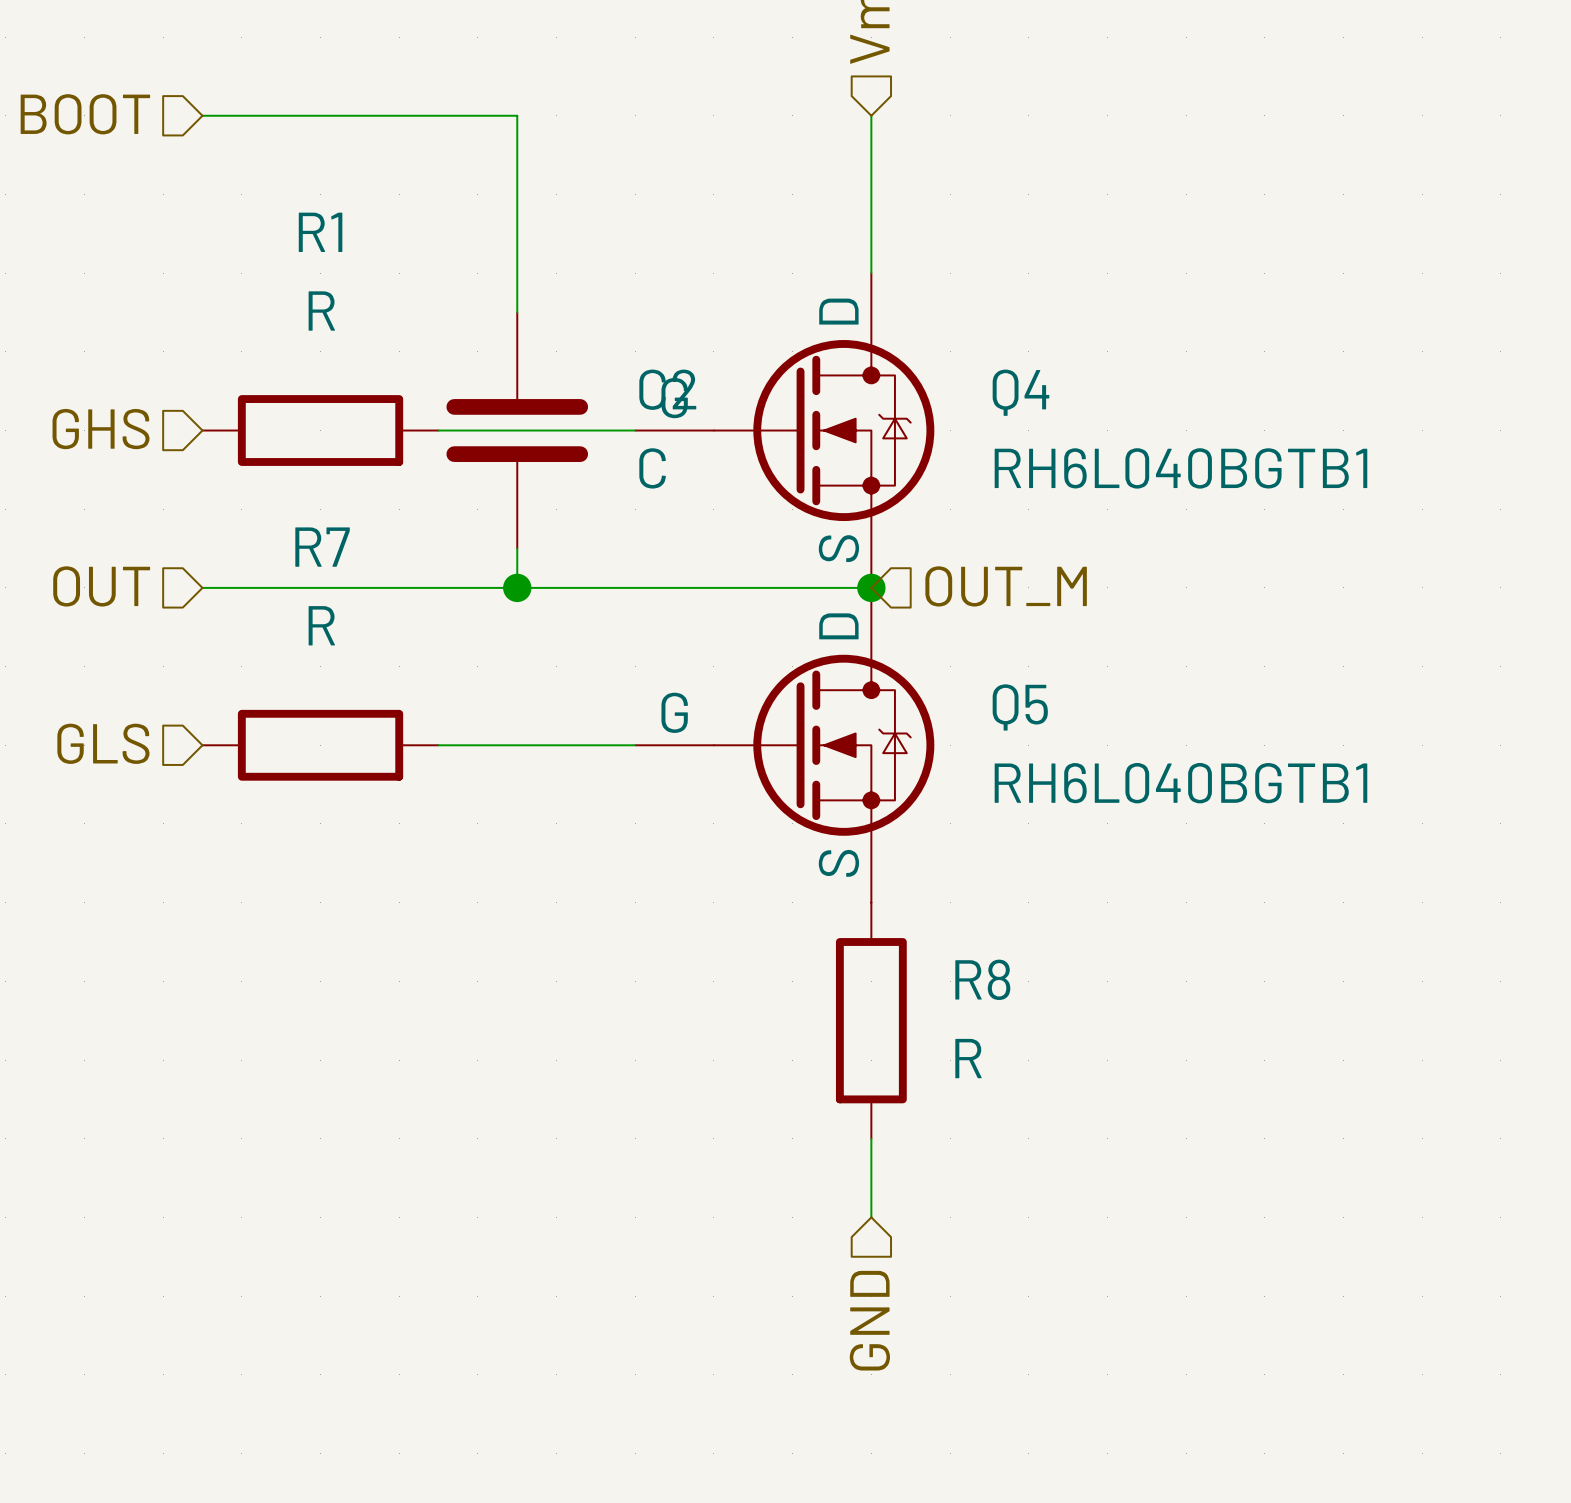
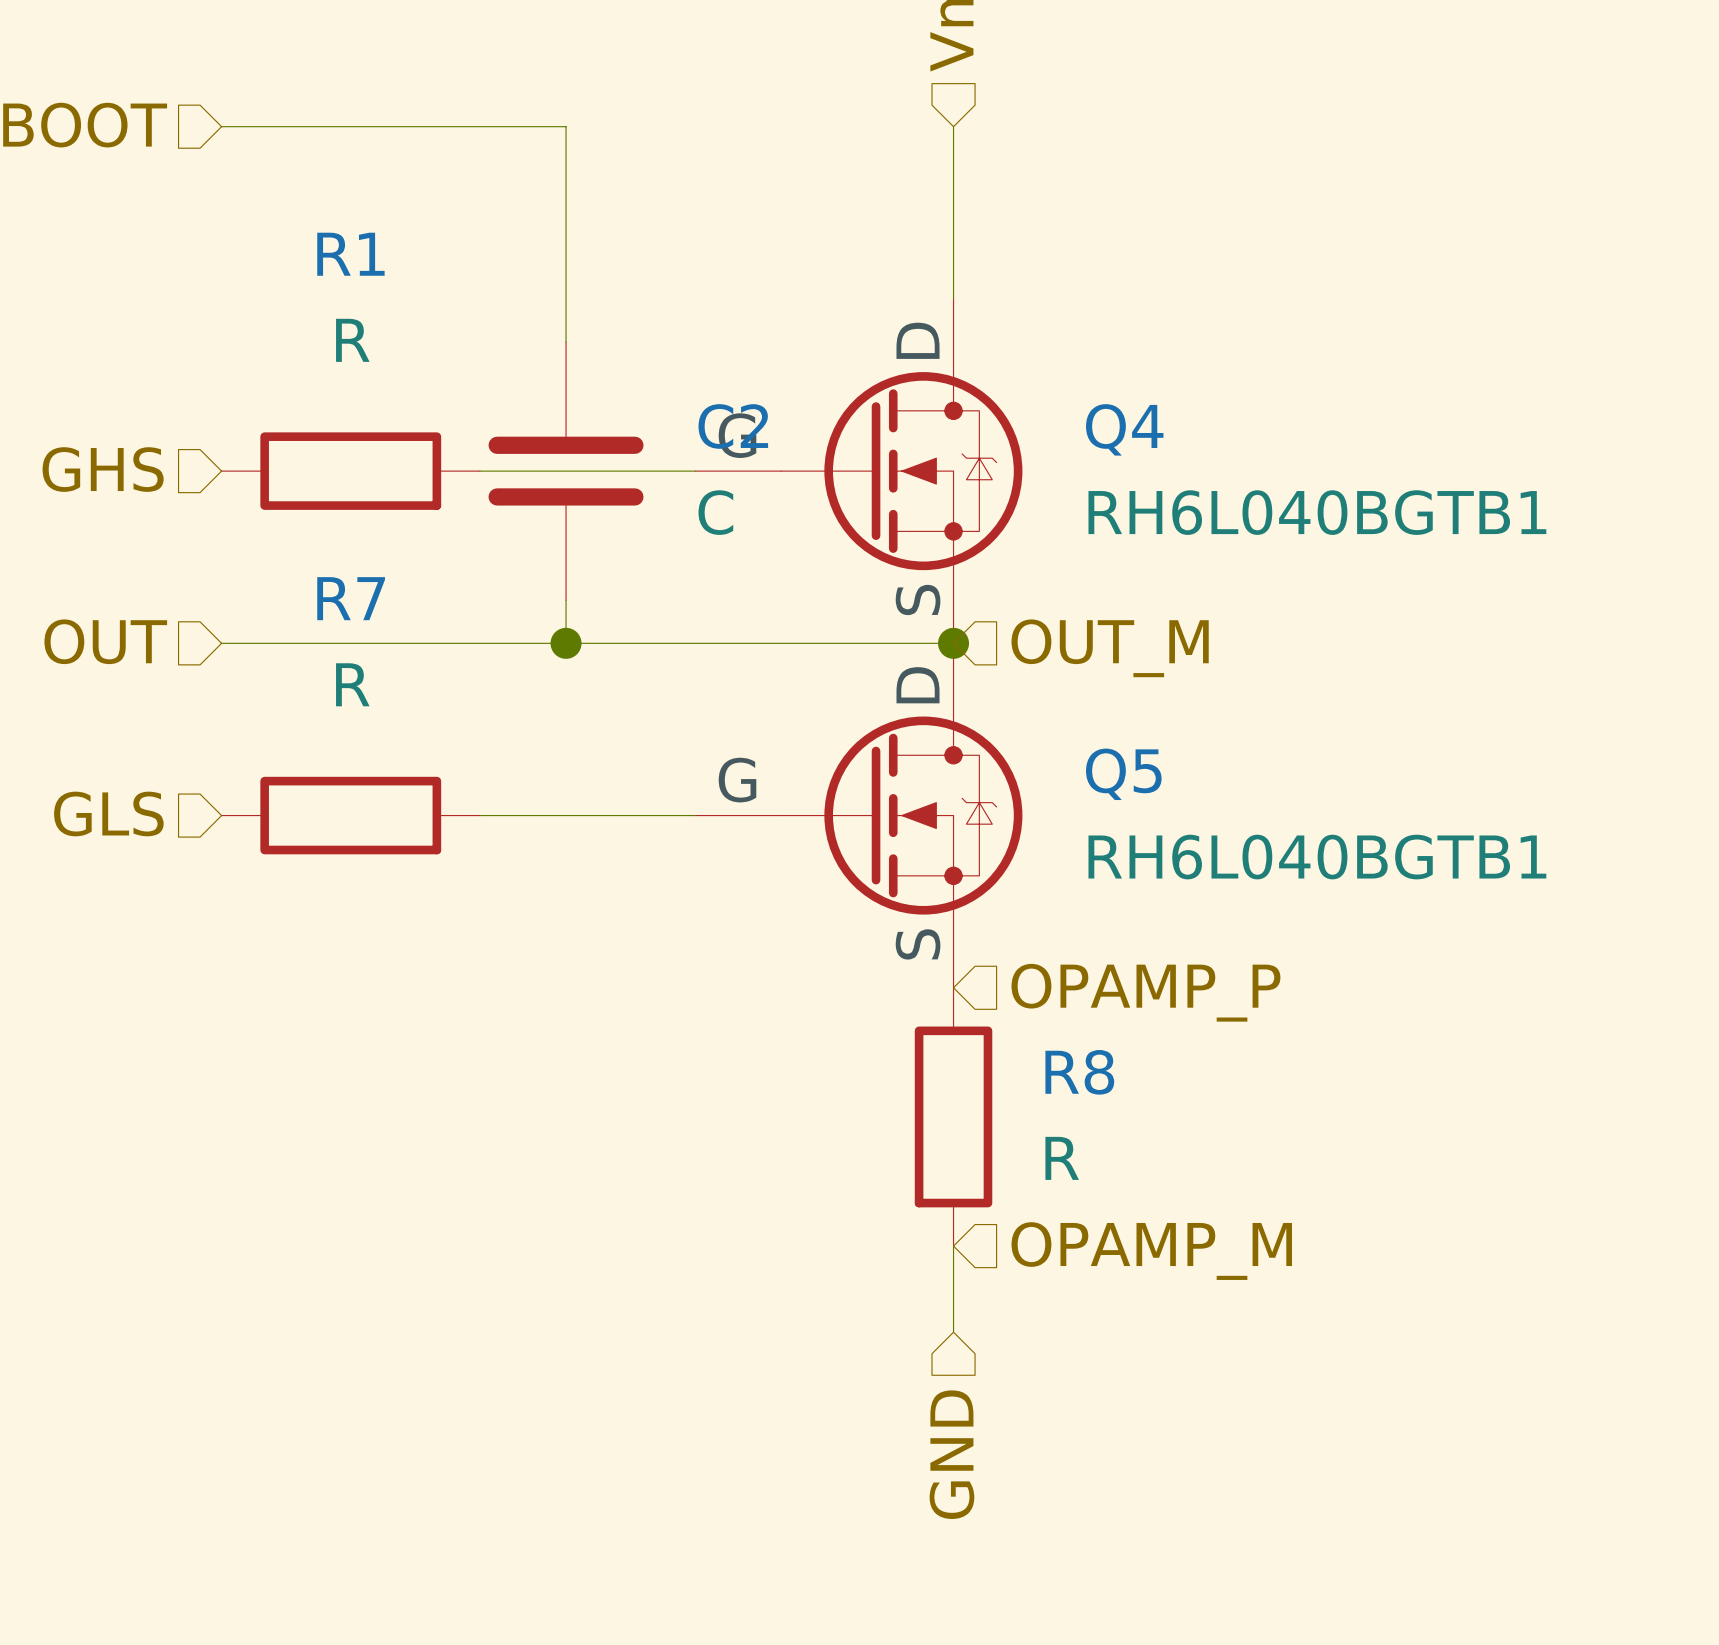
hierarchical label: none -> OPAMP_P (1145, 992)
hierarchical label: none -> OPAMP_M (1151, 1251)

